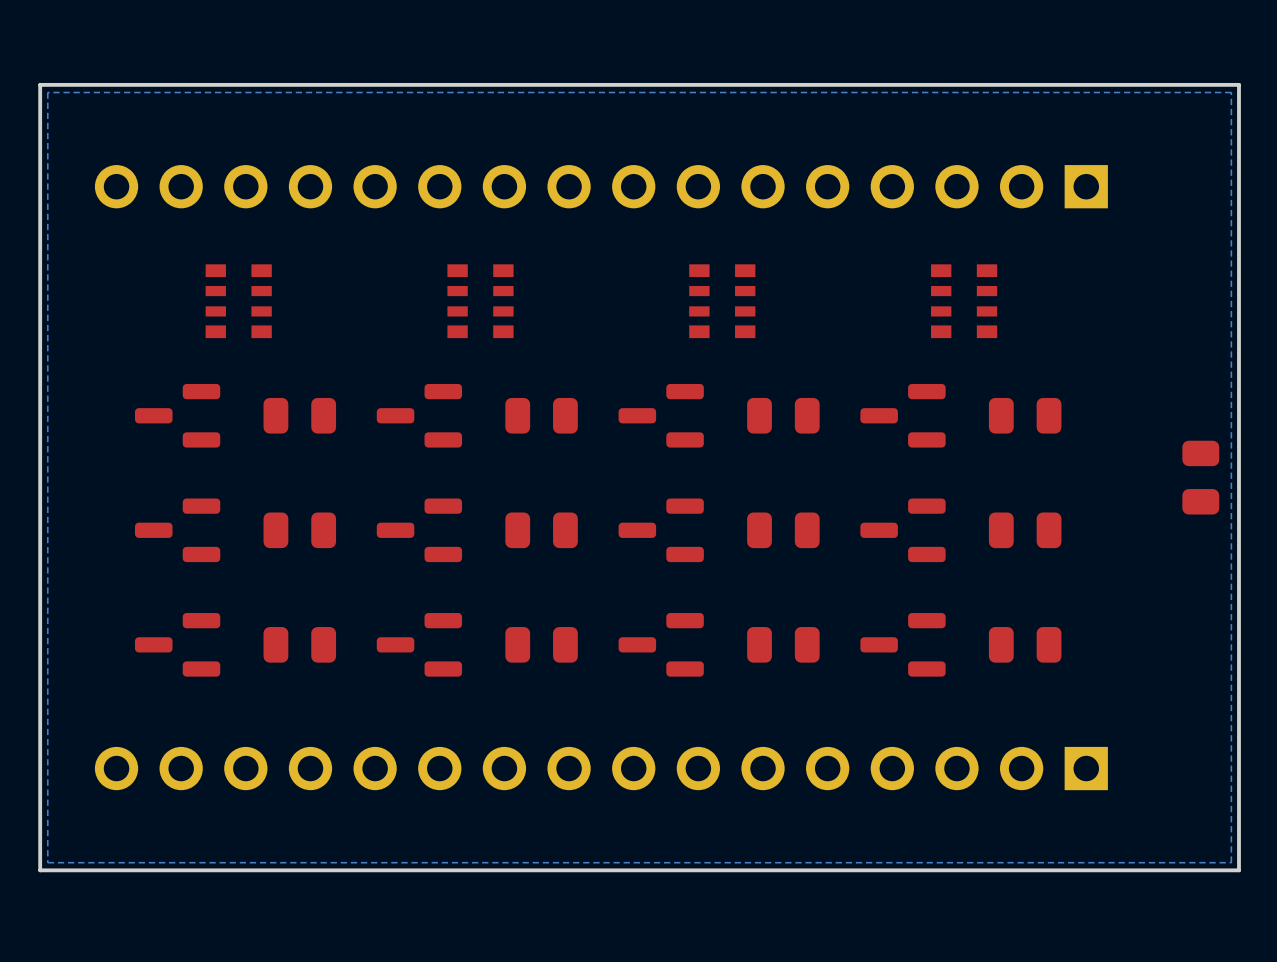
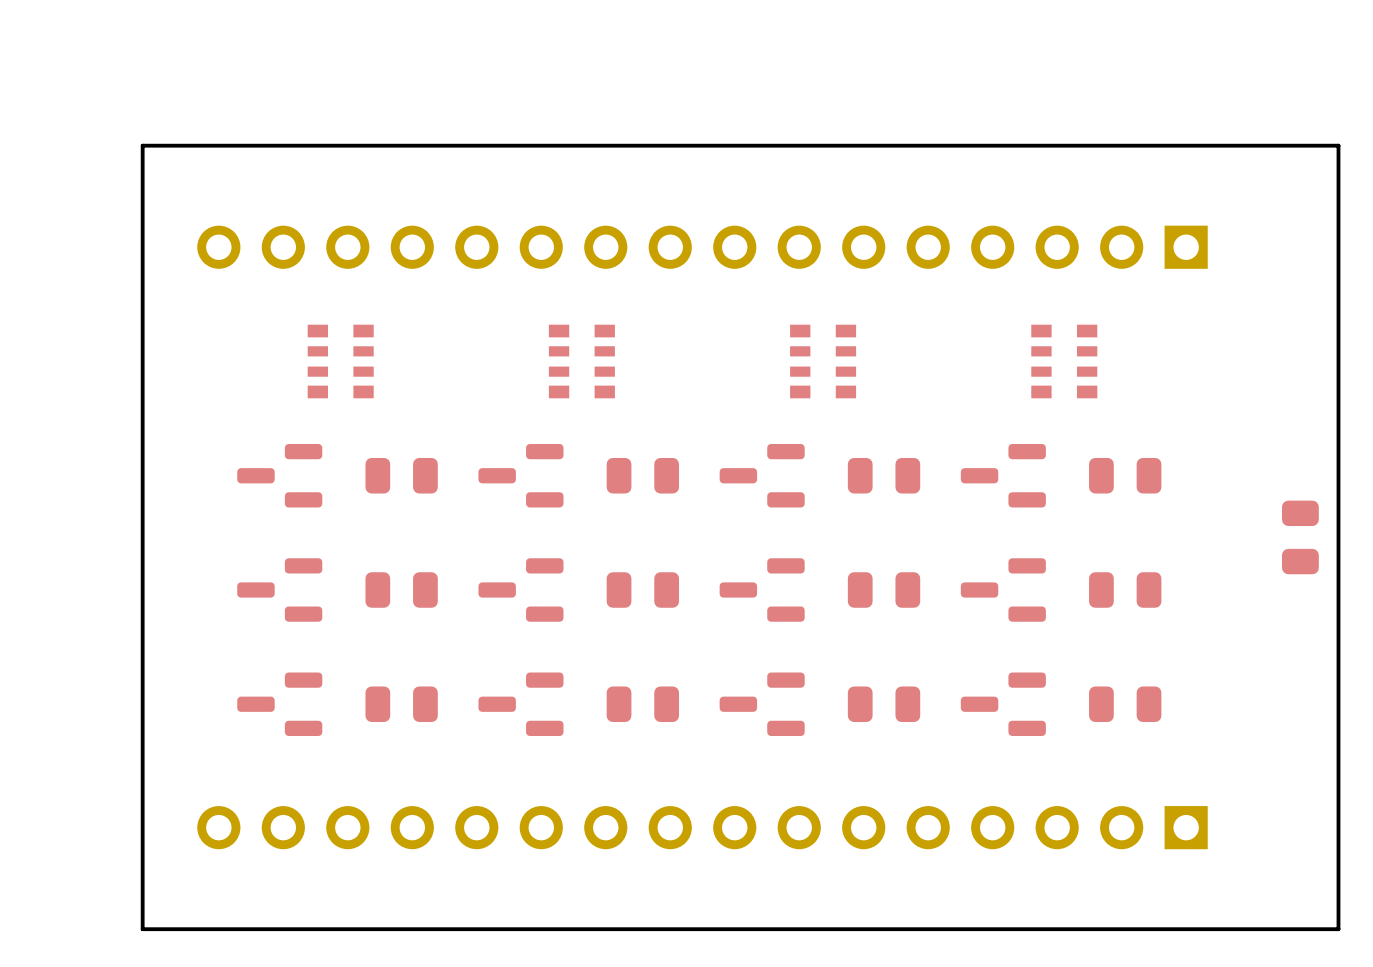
bottom zone outline: (1231, 92) (47, 92) (47, 862) (1231, 862) (1231, 92) -> none

